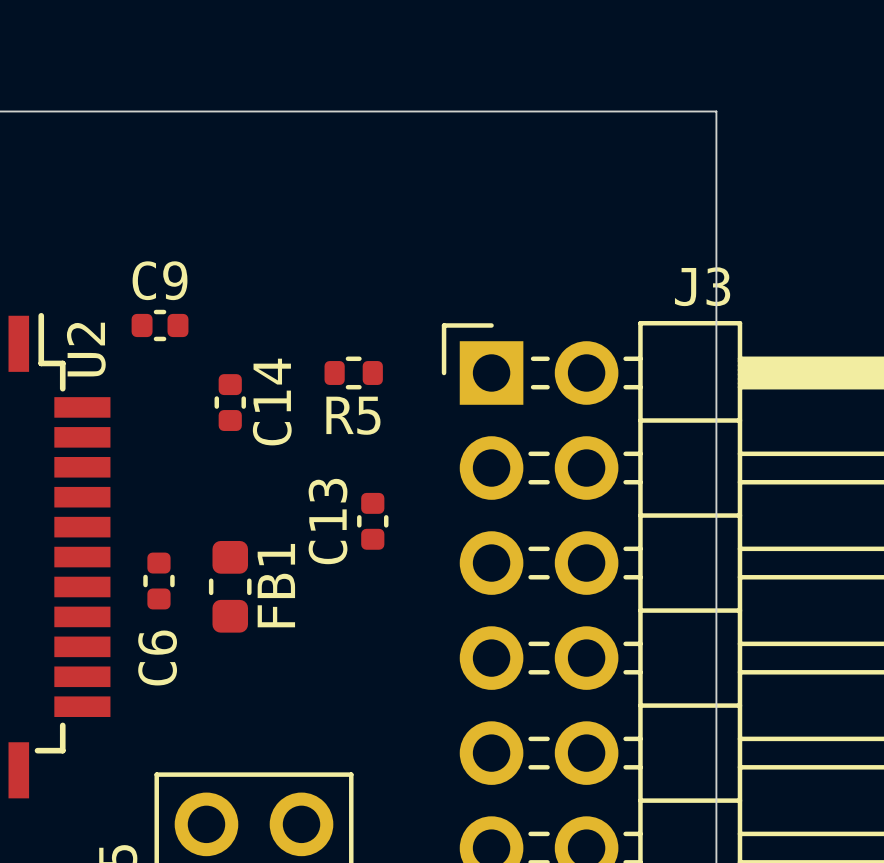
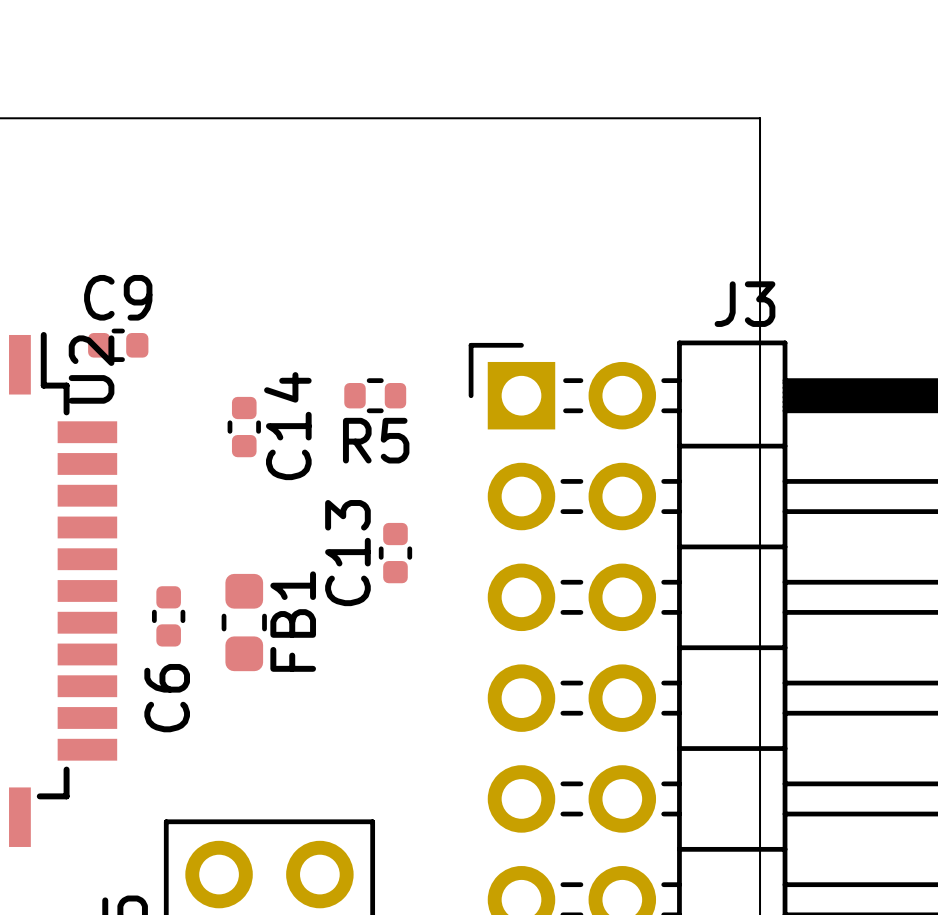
C9 position: (160, 325) -> (118, 345)

